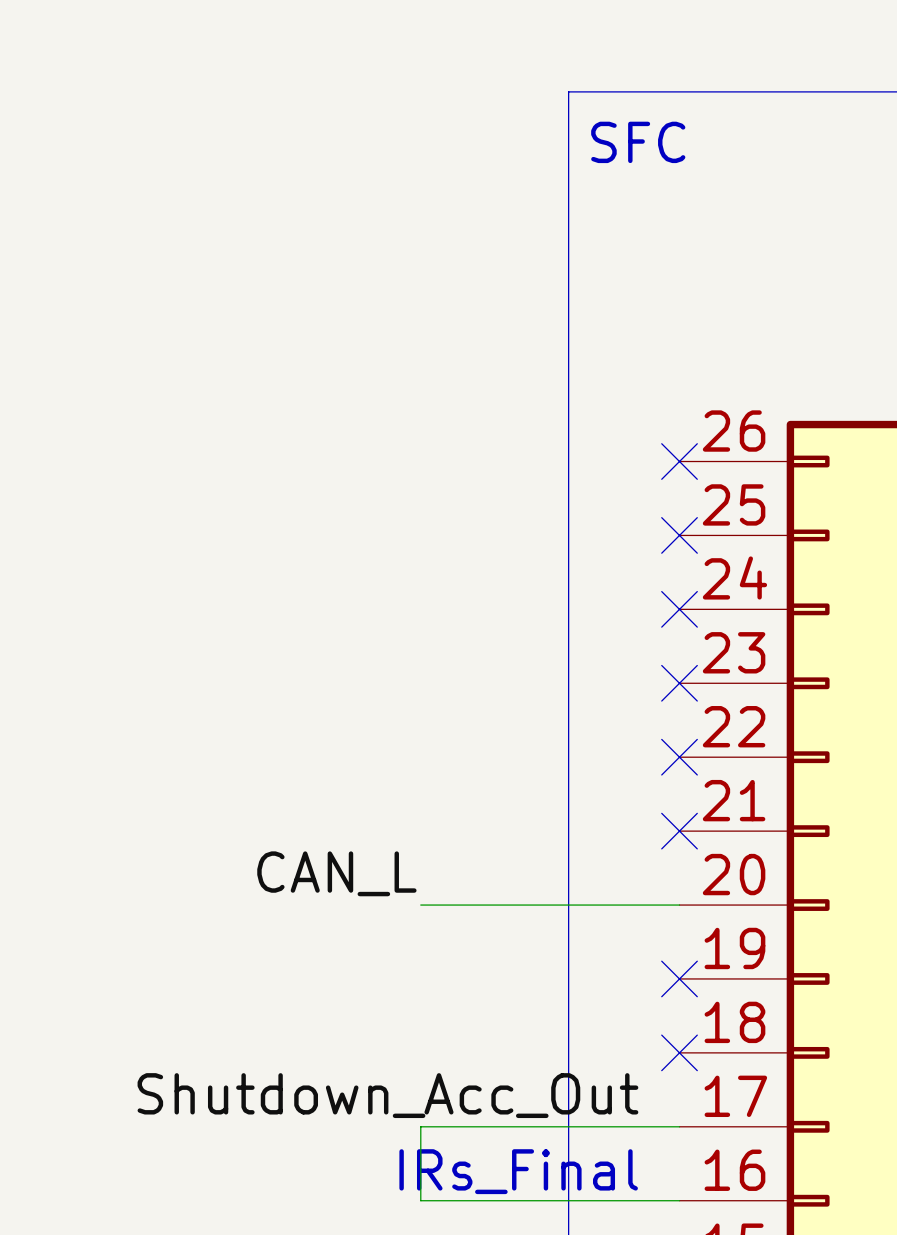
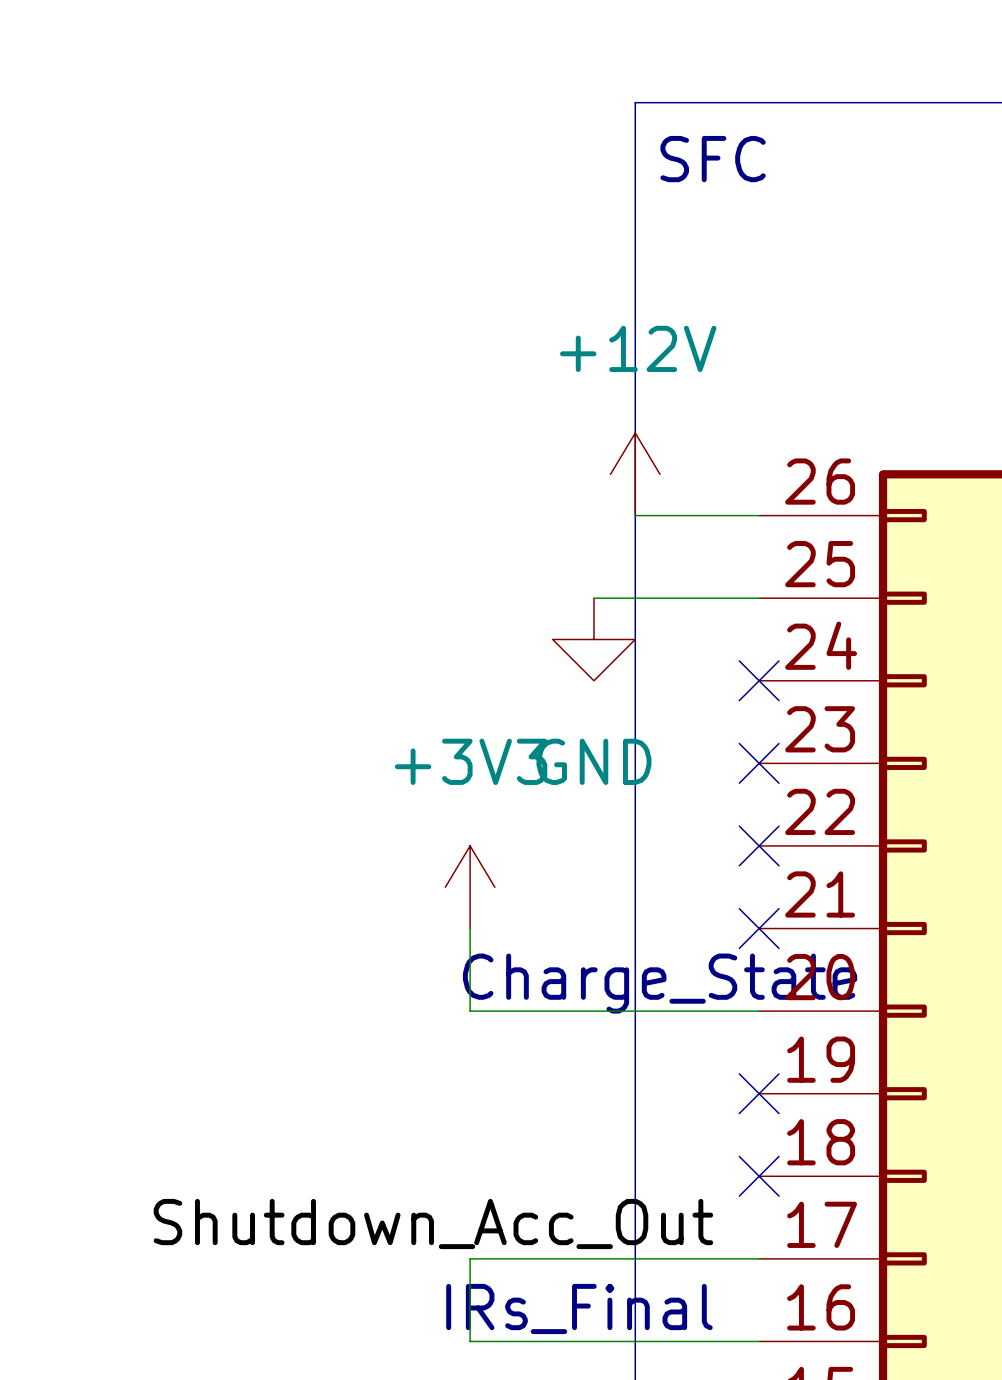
power symbol: none -> +12V (635, 474)
wire: none -> (635, 515) (759, 515)
no-connect mark: (679, 461) -> none
wire: none -> (593, 598) (759, 598)
no-connect mark: (679, 535) -> none
power symbol: none -> GND (593, 639)
power symbol: none -> +3V3 (470, 887)
wire: none -> (470, 928) (470, 1011)
label: CAN_L (336, 873) -> none
text: none -> Charge_State (660, 983)

